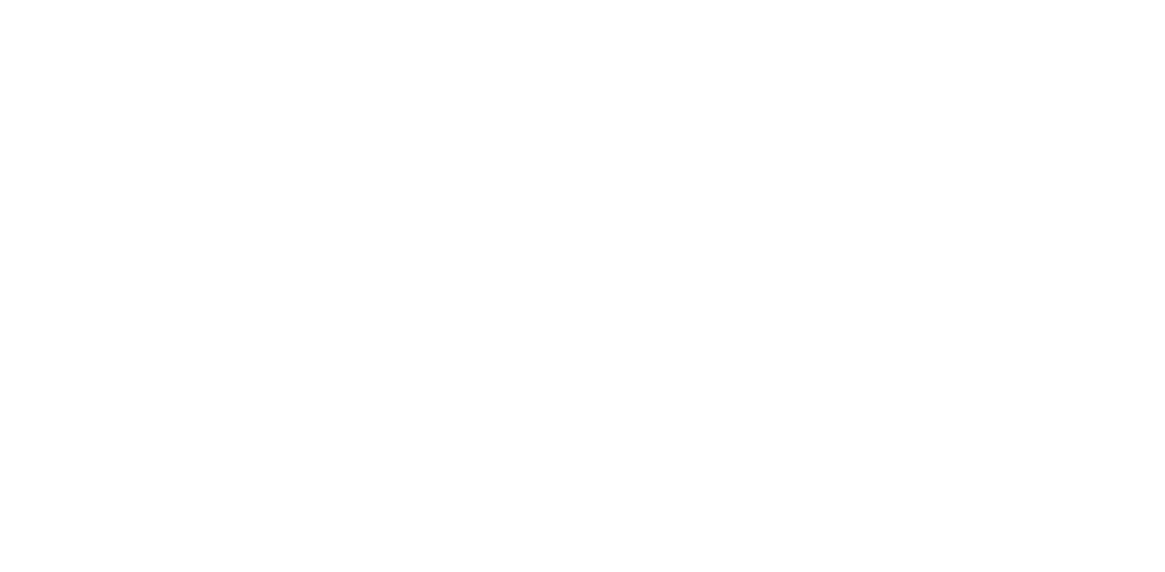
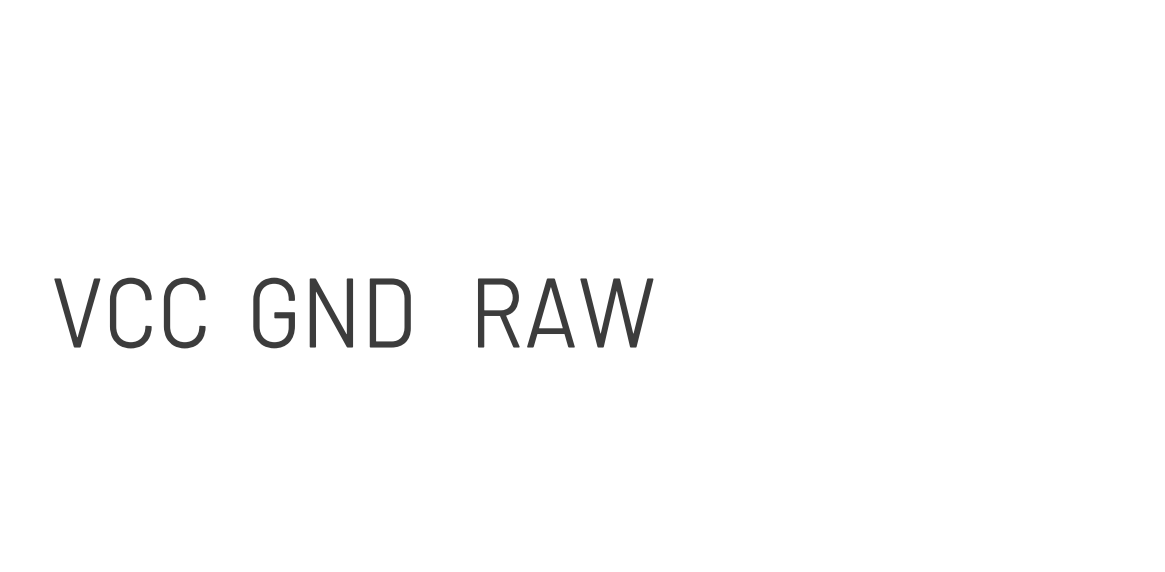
text: none -> VCC GND RAW (353, 313)

